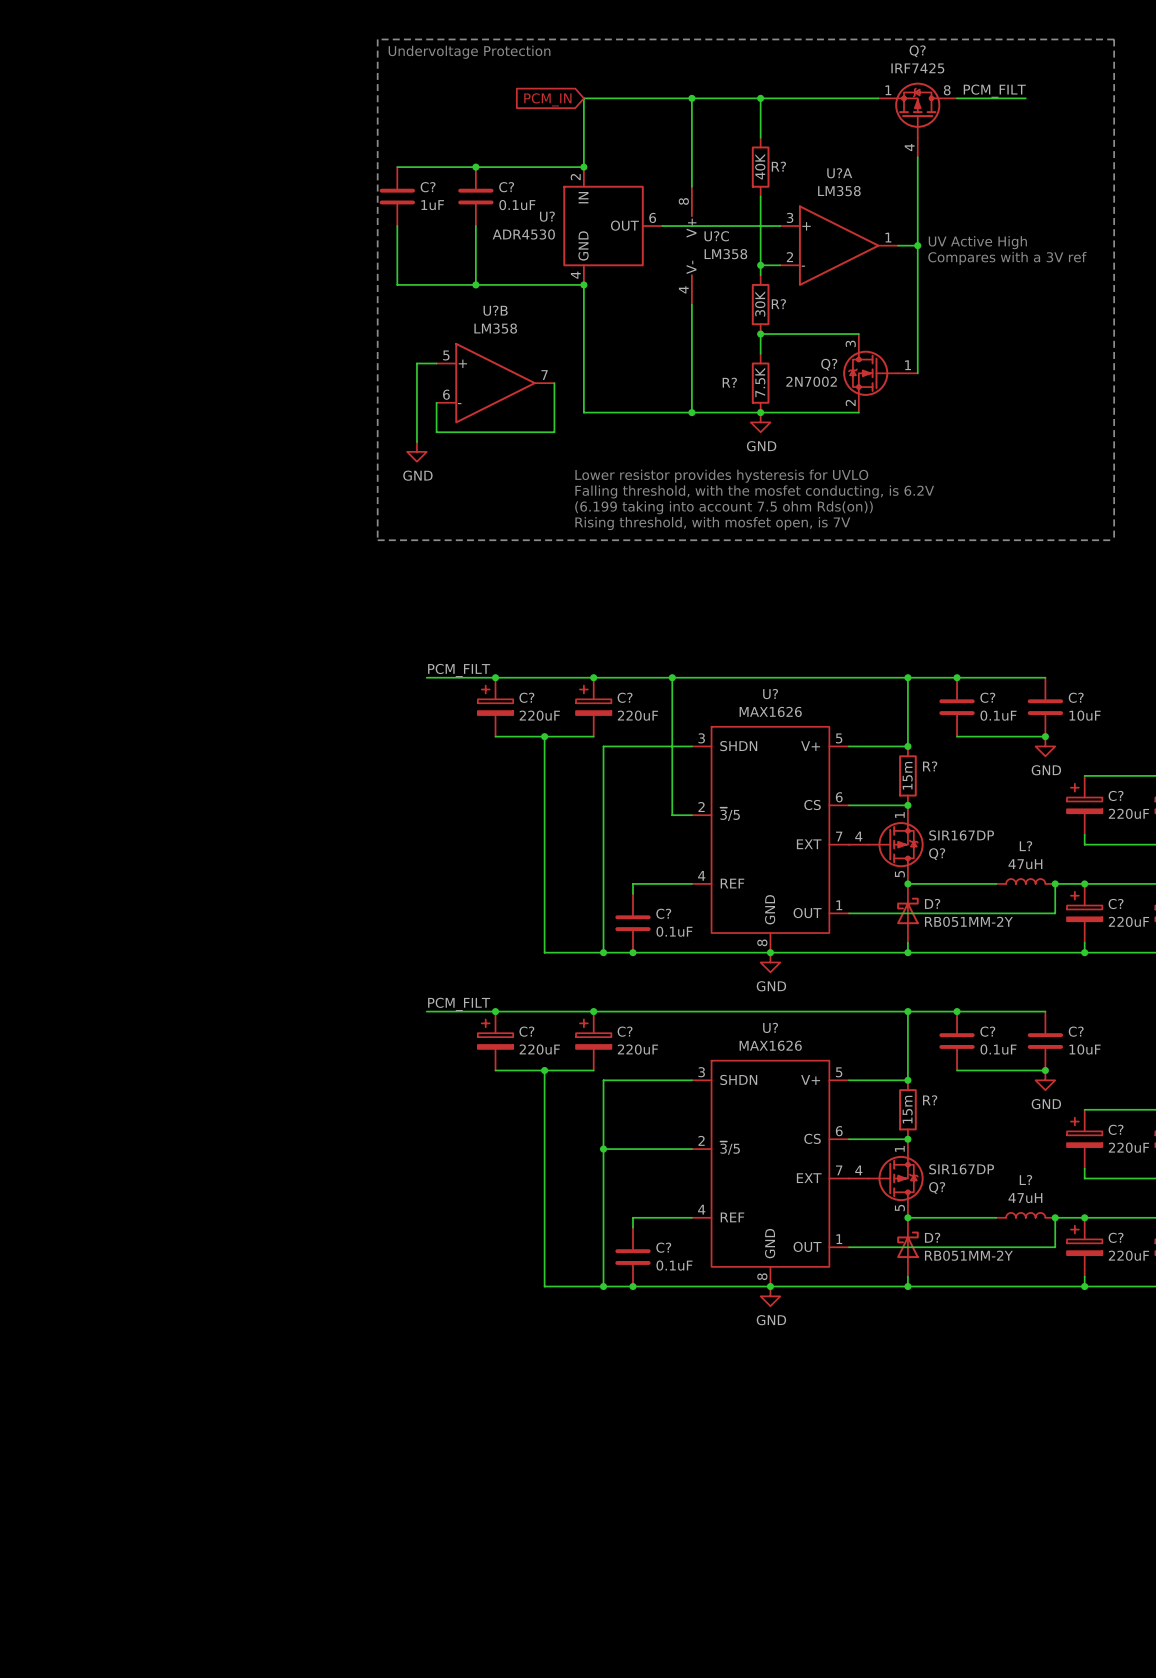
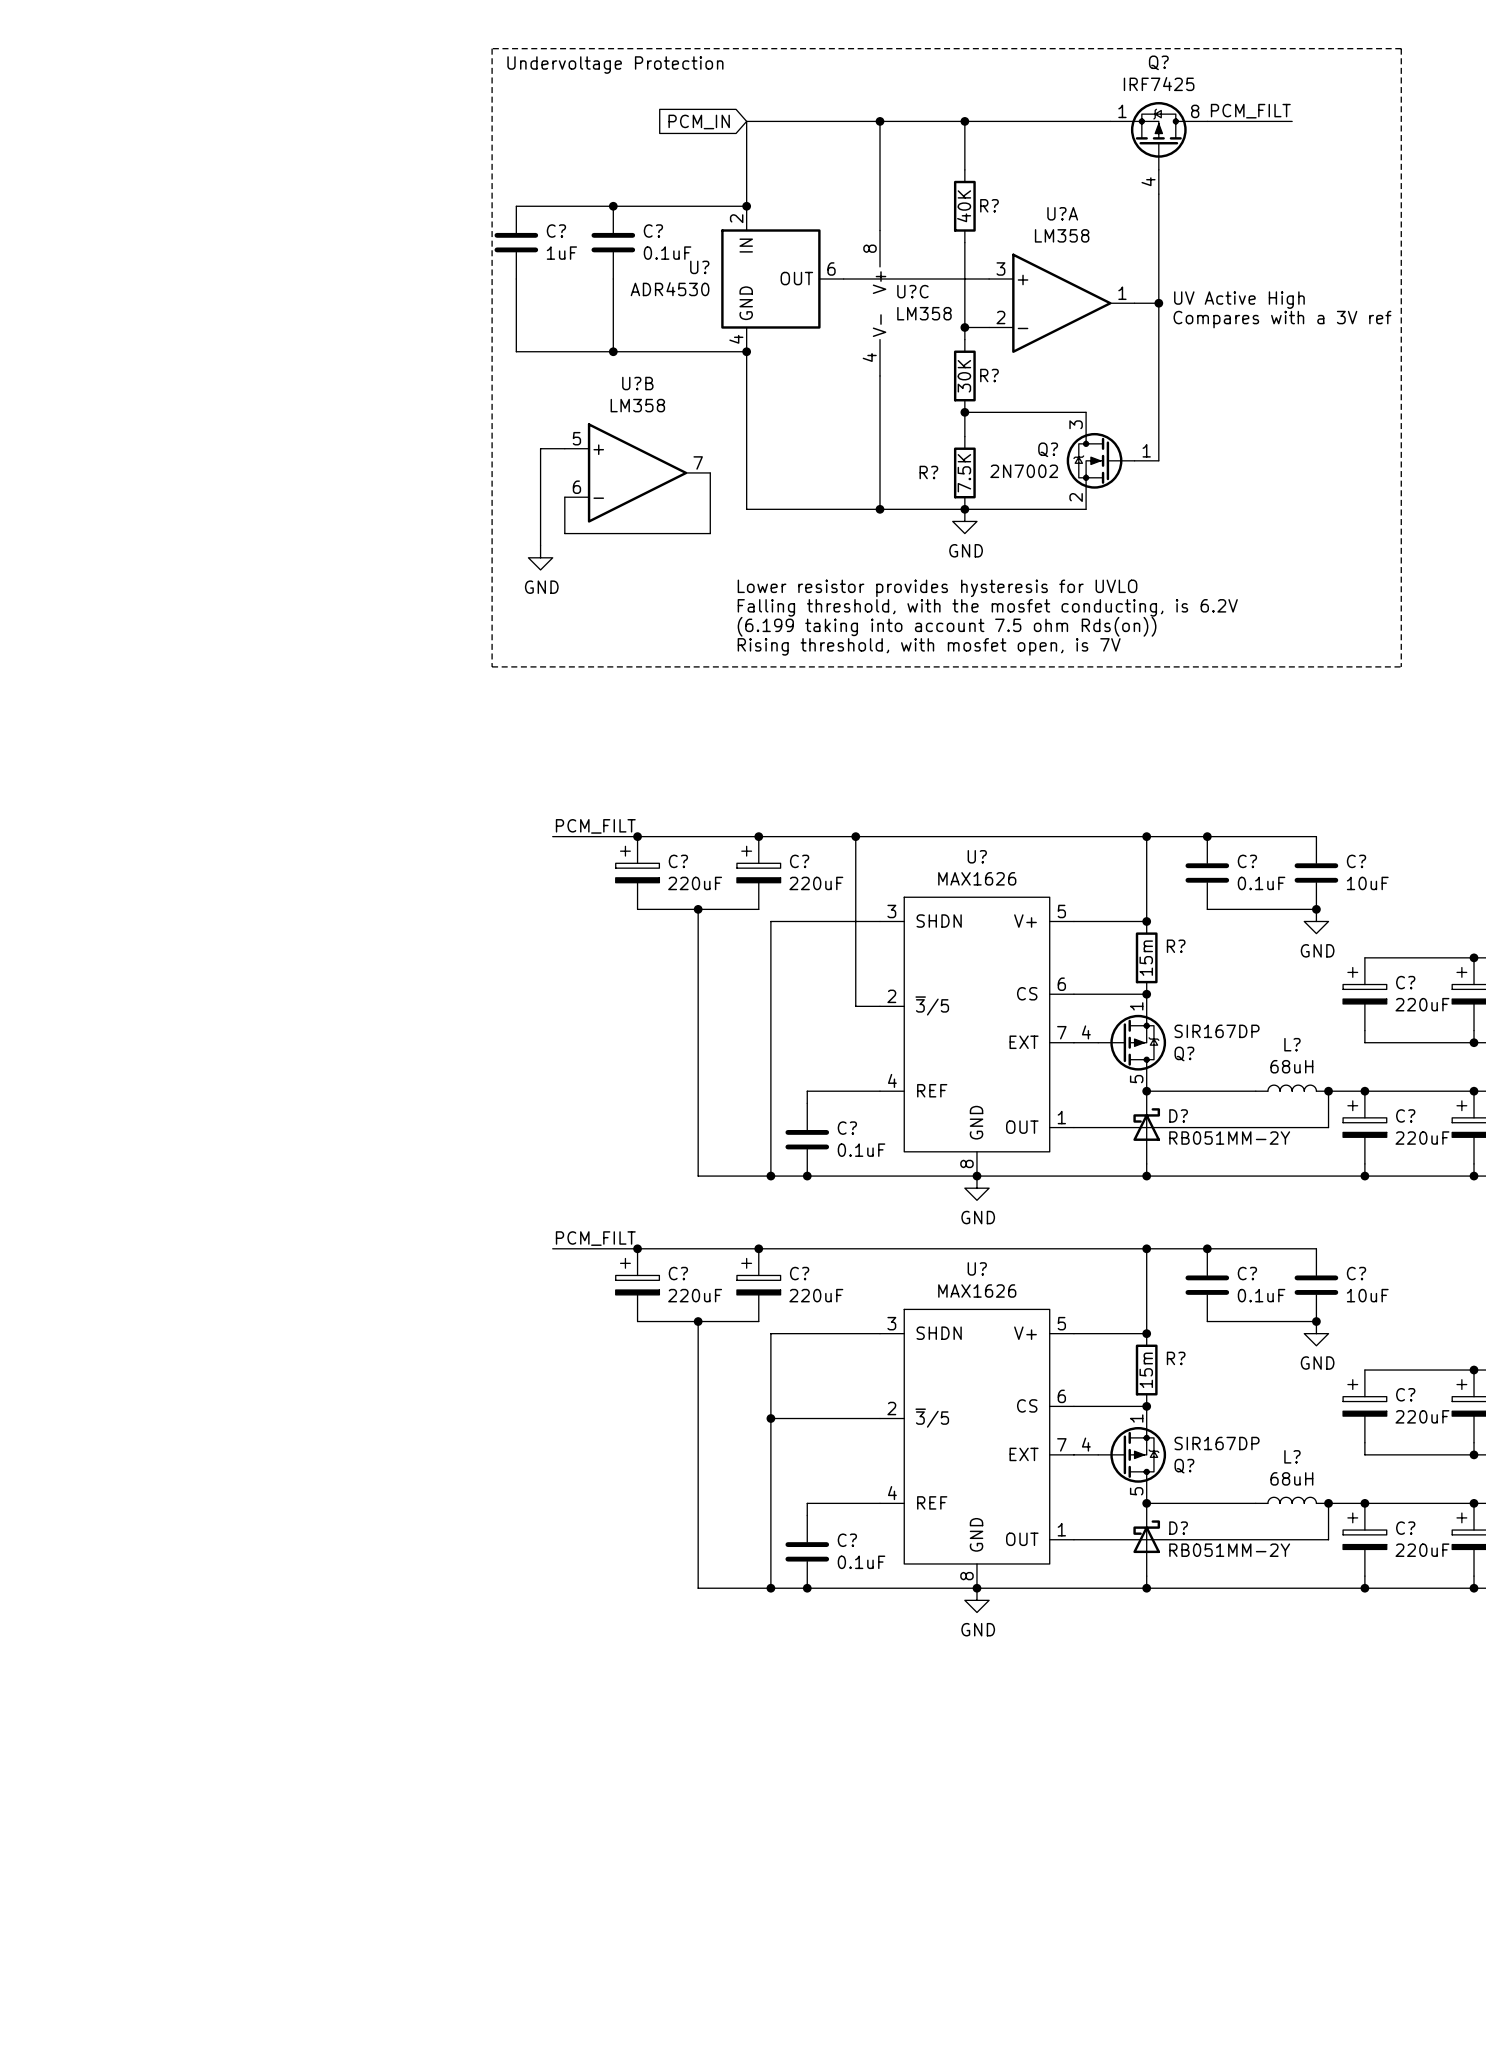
L? value: 47uH (1025, 864) -> 68uH (1291, 1066)
L? value: 47uH (1025, 1198) -> 68uH (1291, 1478)

